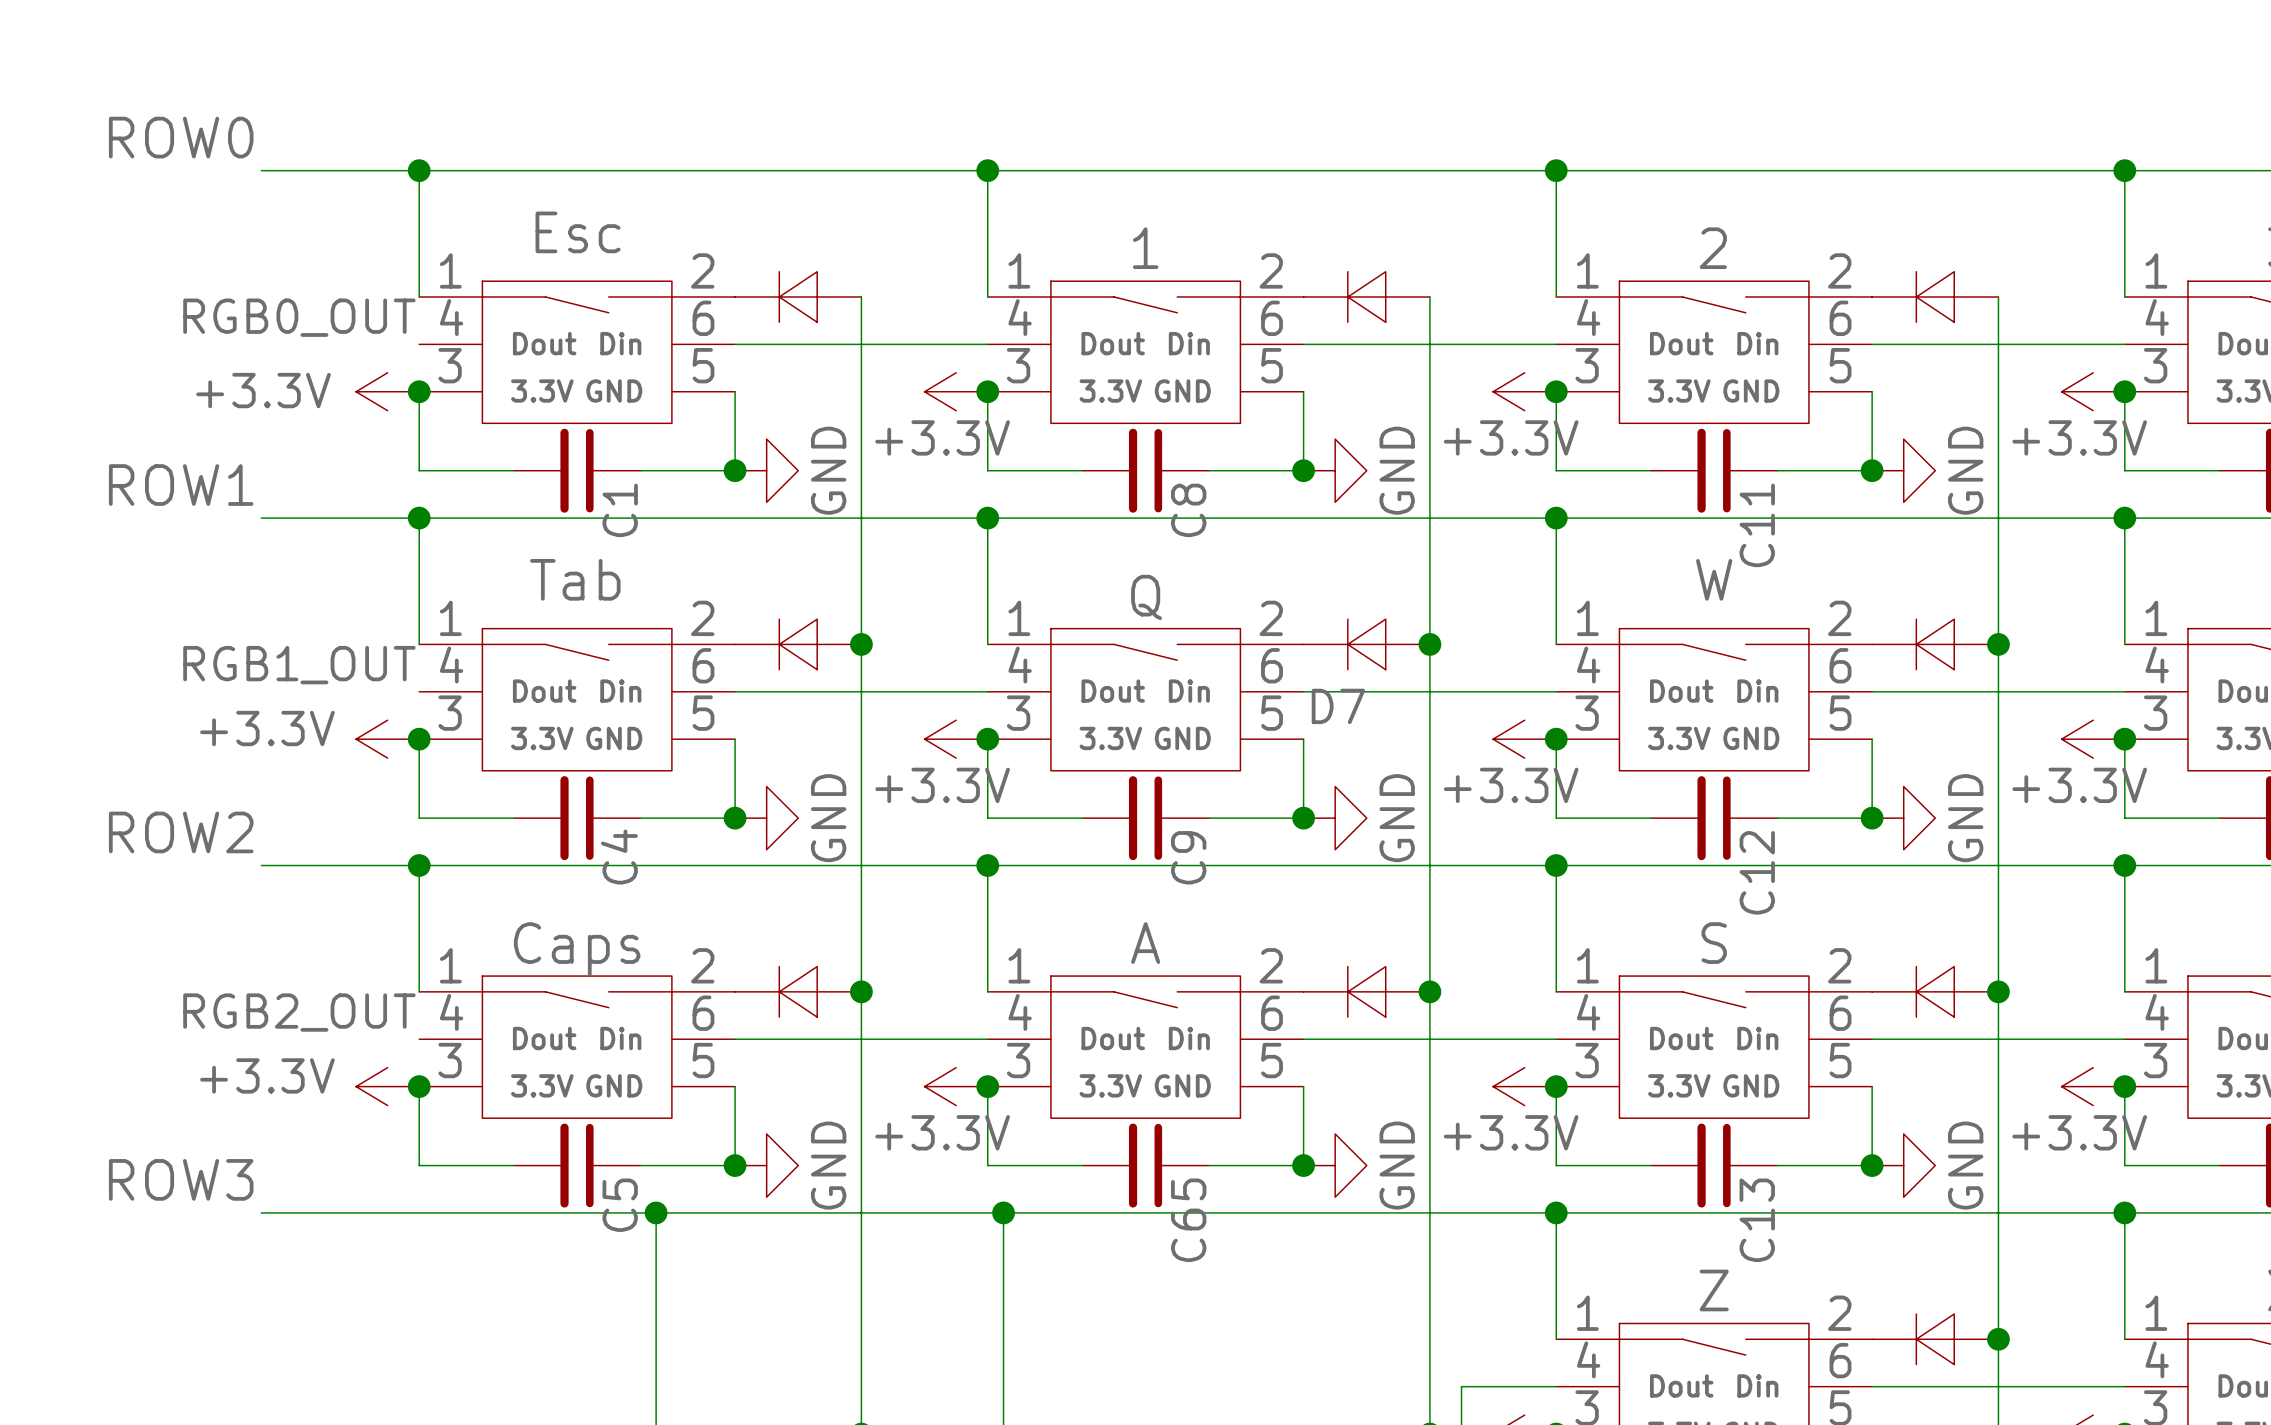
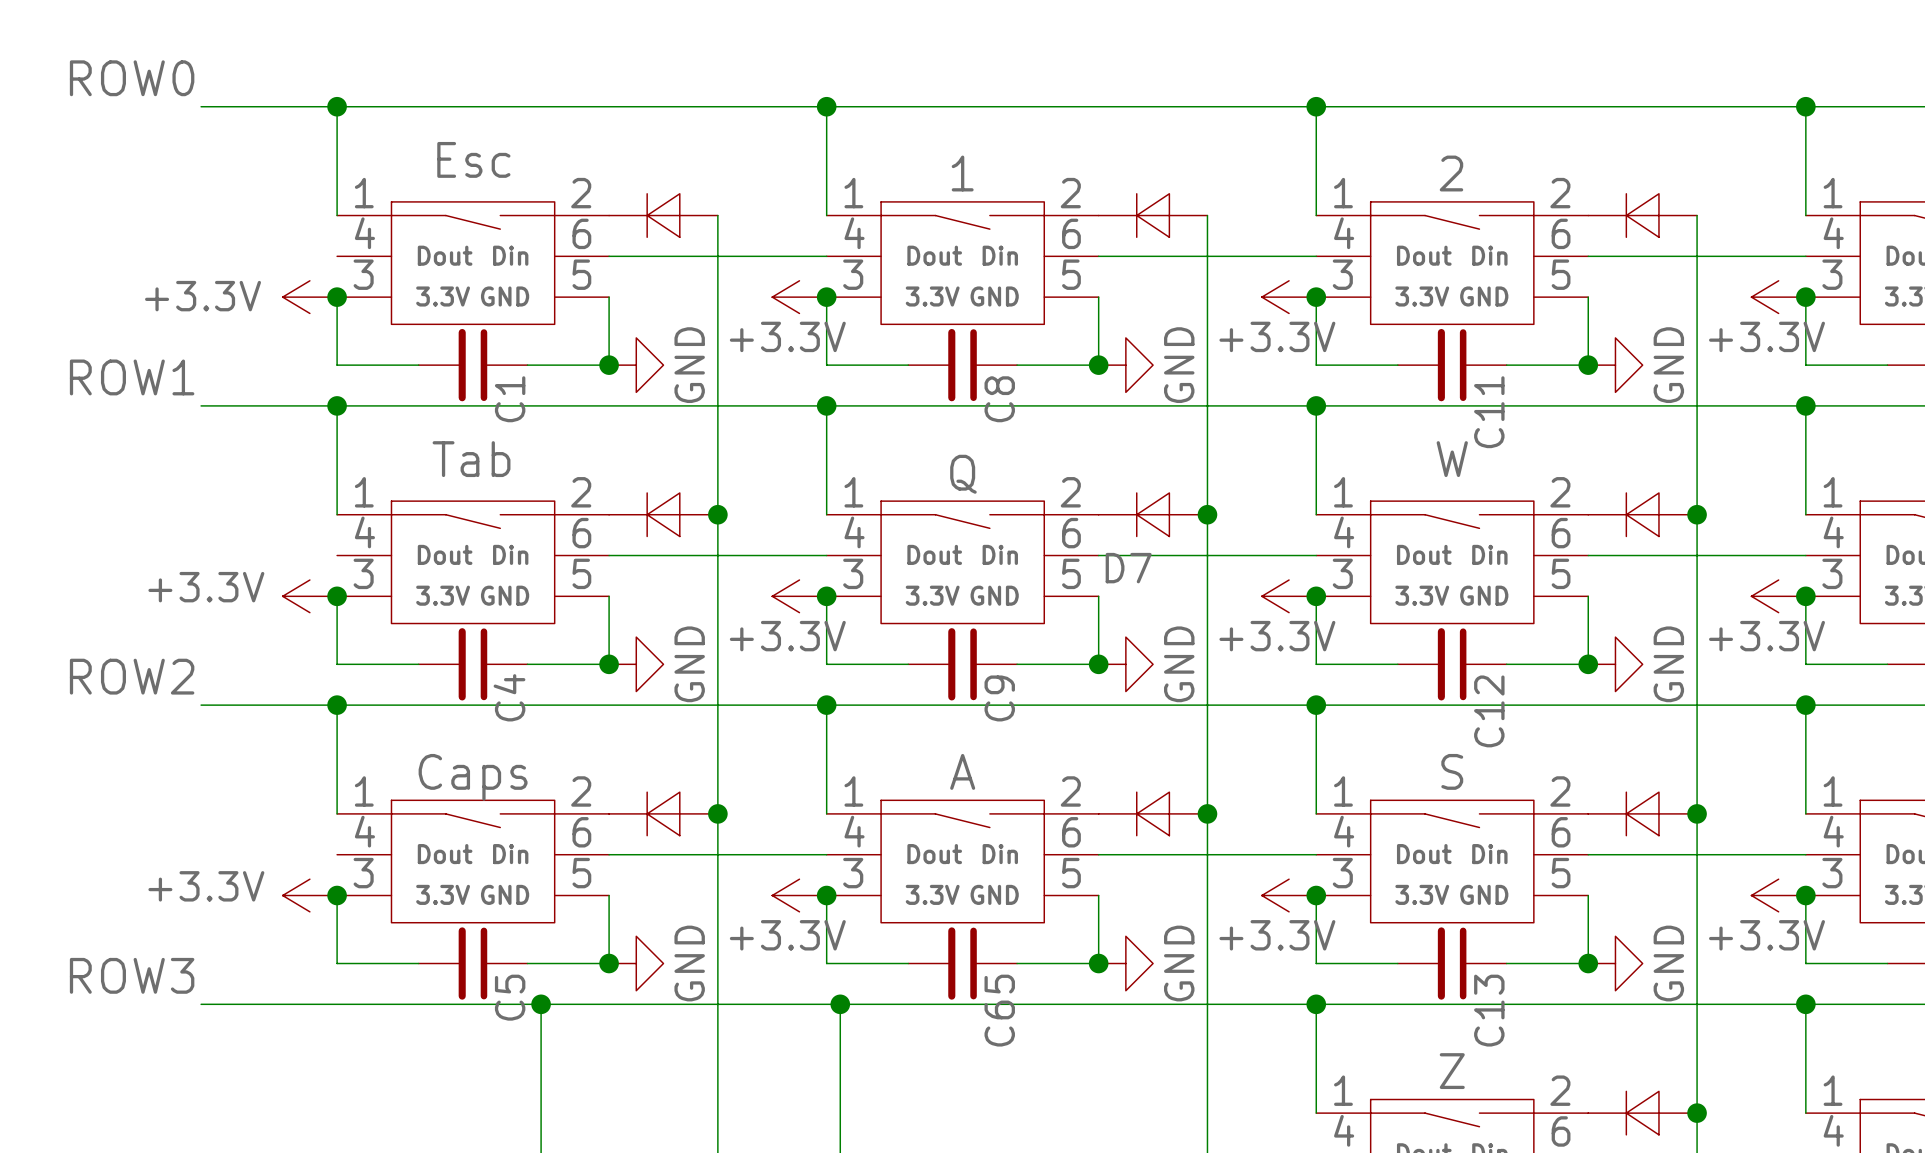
label: RGB0_OUT (299, 317) -> none
label: RGB1_OUT (299, 665) -> none
label: RGB2_OUT (299, 1012) -> none

